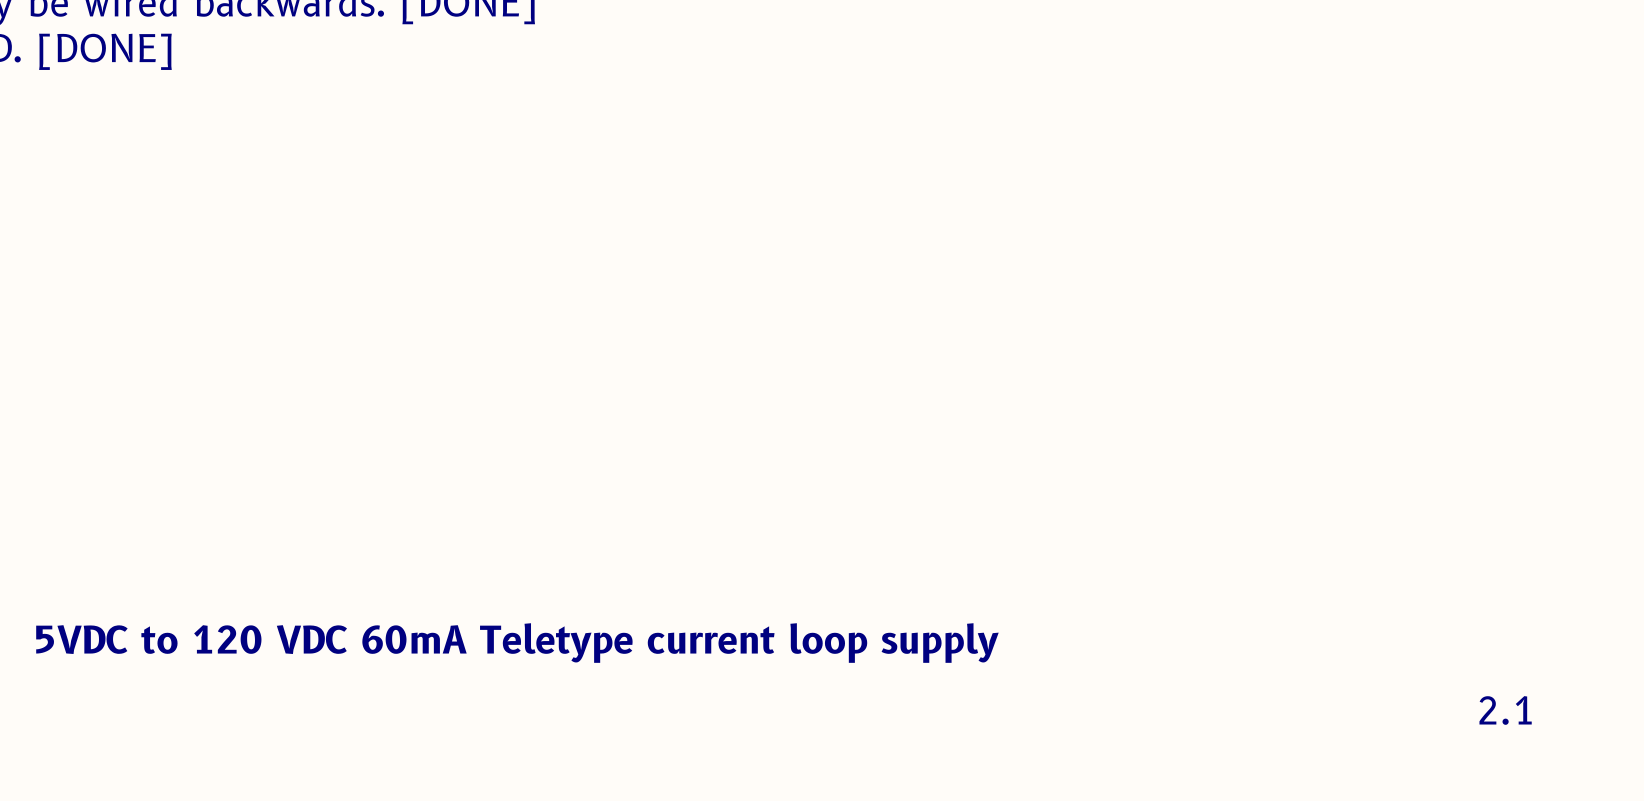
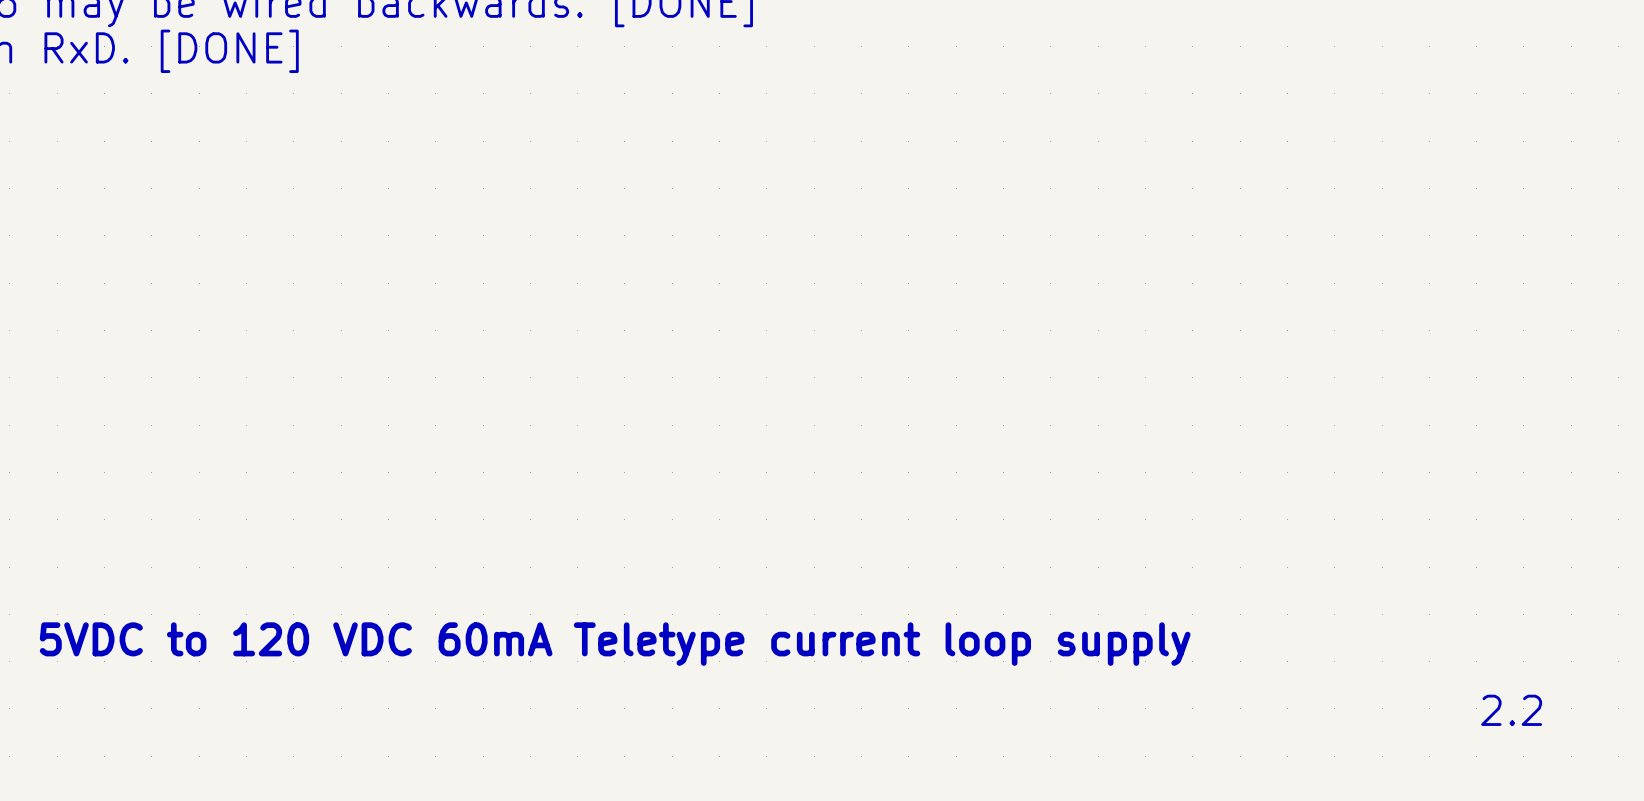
text: 2.1 (1505, 710) -> 2.2 (1511, 710)

